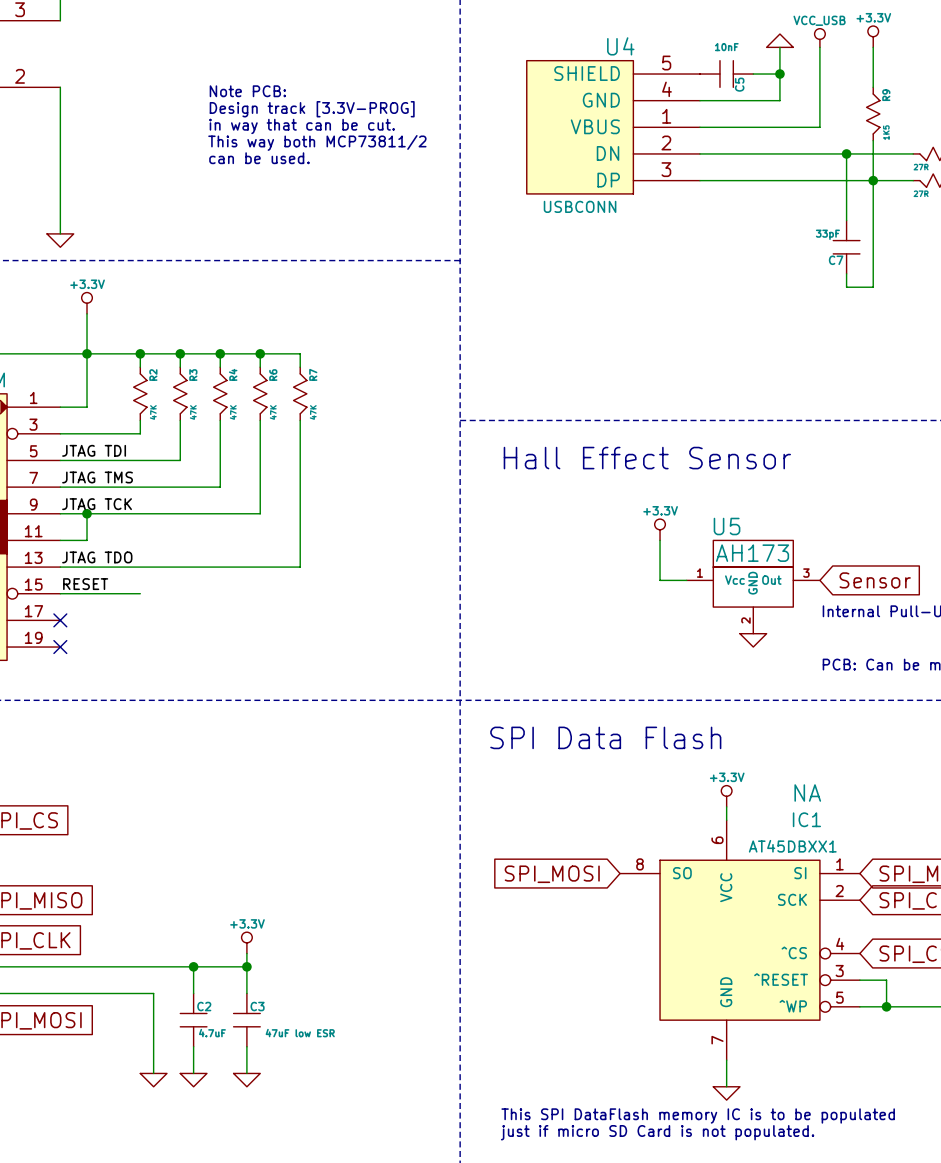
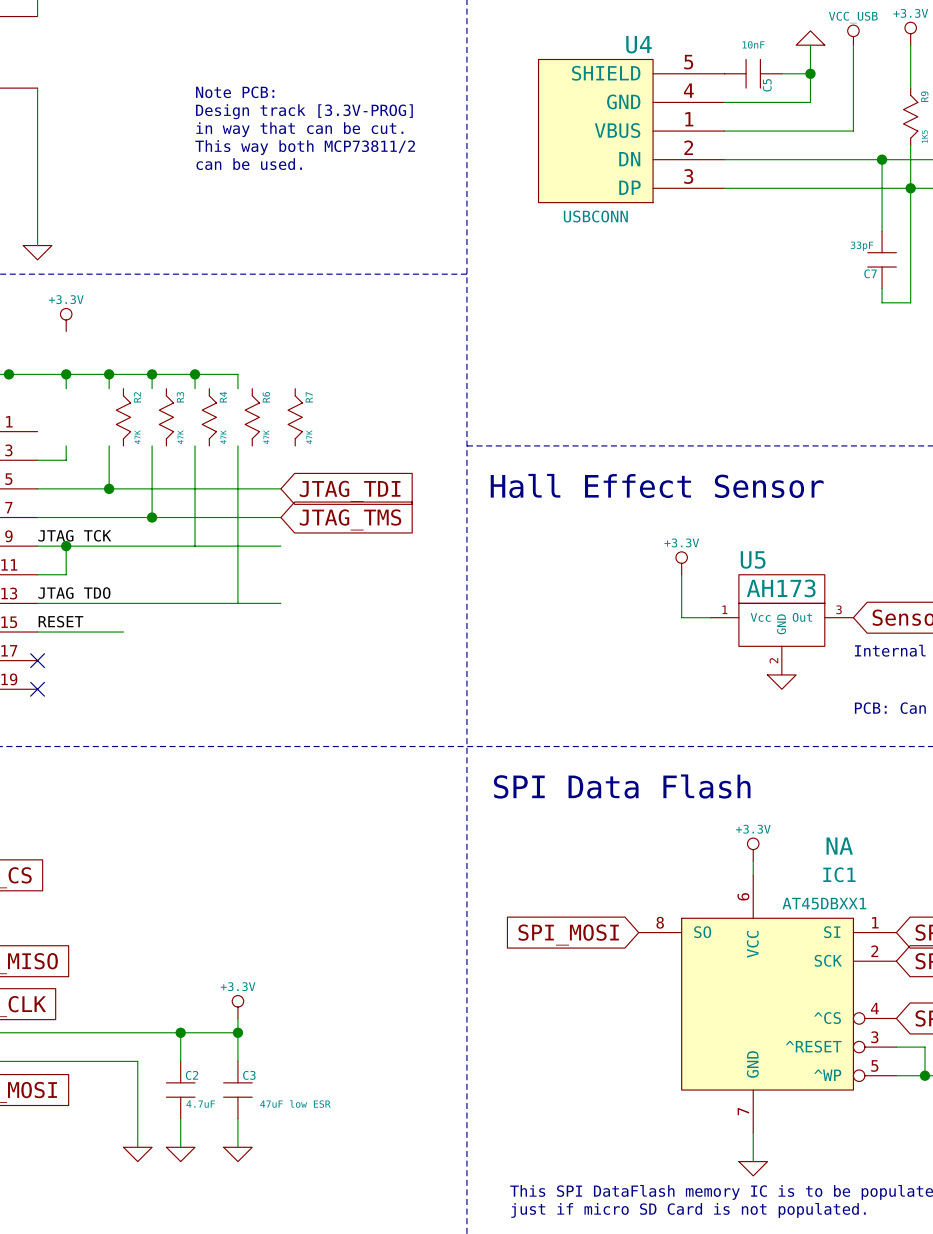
wire: (87, 313) (87, 353) -> (109, 445) (109, 488)
junction: none -> (8, 374)
junction: none -> (109, 374)
wire: (140, 353) (140, 367) -> none
junction: (140, 353) -> none
junction: none -> (152, 374)
wire: (180, 353) (180, 367) -> (109, 374) (109, 388)
junction: (180, 353) -> none
junction: none -> (195, 374)
wire: (220, 353) (220, 367) -> (152, 374) (152, 388)
junction: (220, 353) -> none
wire: (246, 353) (300, 353) (300, 367) -> (237, 374) (237, 388)
wire: (260, 353) (260, 367) -> (195, 374) (195, 388)
junction: (260, 353) -> none
wire: (87, 367) (87, 407) (60, 407) -> none
wire: (140, 420) (140, 433) (87, 433) -> (66, 445) (66, 460)
wire: none -> (152, 445) (152, 517)
wire: (180, 420) (180, 460) -> (280, 488) (166, 488)
wire: none -> (195, 445) (195, 546)
wire: (220, 420) (220, 487) -> (280, 517) (209, 517)
wire: none -> (237, 445) (237, 603)
wire: (260, 420) (260, 513) -> (280, 546) (252, 546)
wire: (300, 420) (300, 567) (286, 567) -> none
label: JTAG TDI (94, 450) -> none
junction: none -> (109, 488)
global label: none -> JTAG_TDI (350, 491)
label: JTAG TMS (97, 477) -> none
junction: none -> (152, 517)
global label: none -> JTAG_TMS (350, 519)

